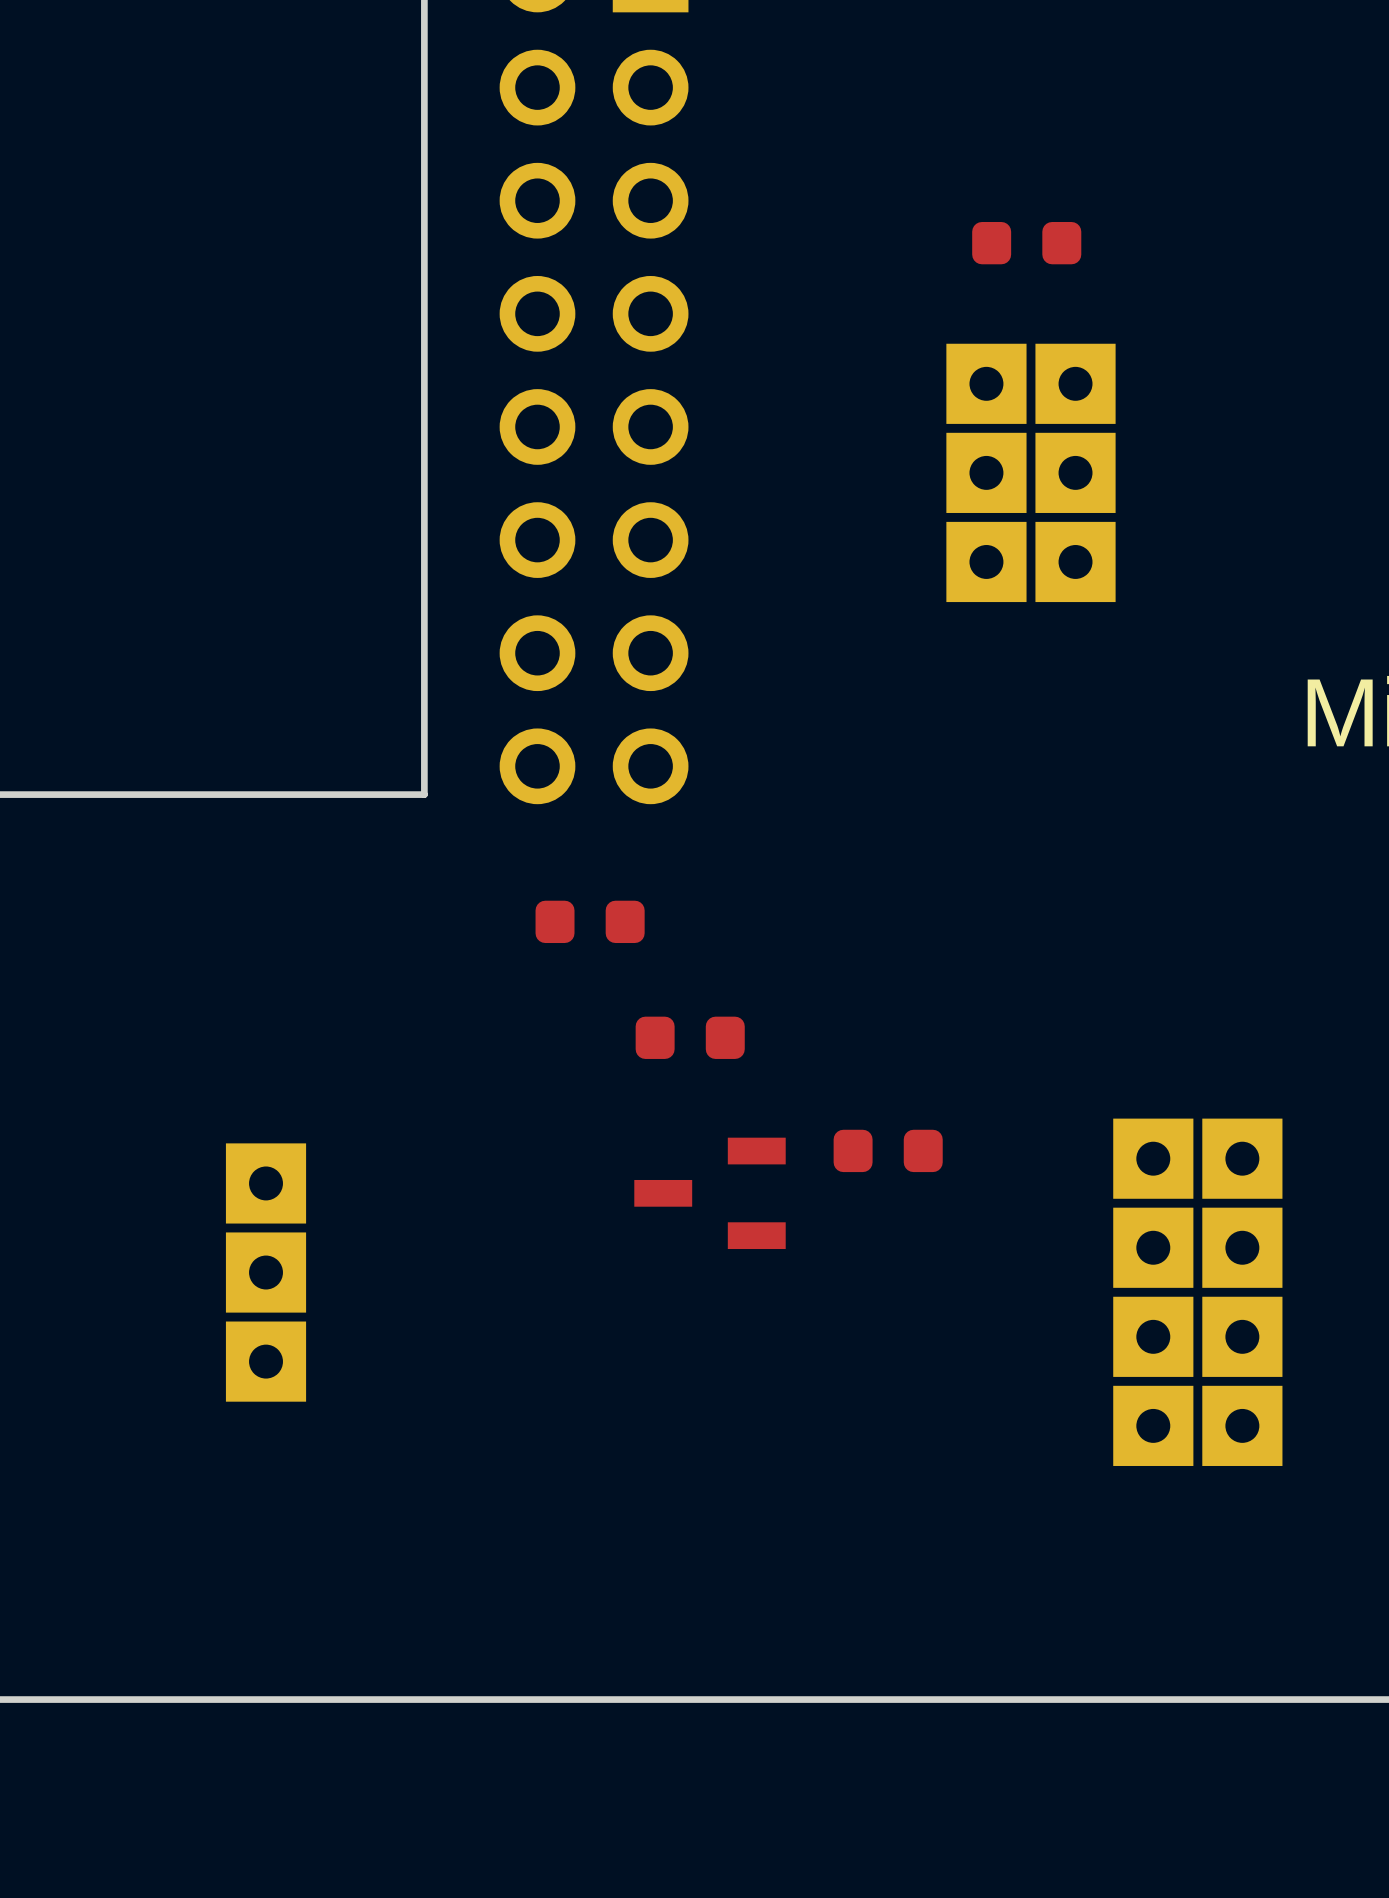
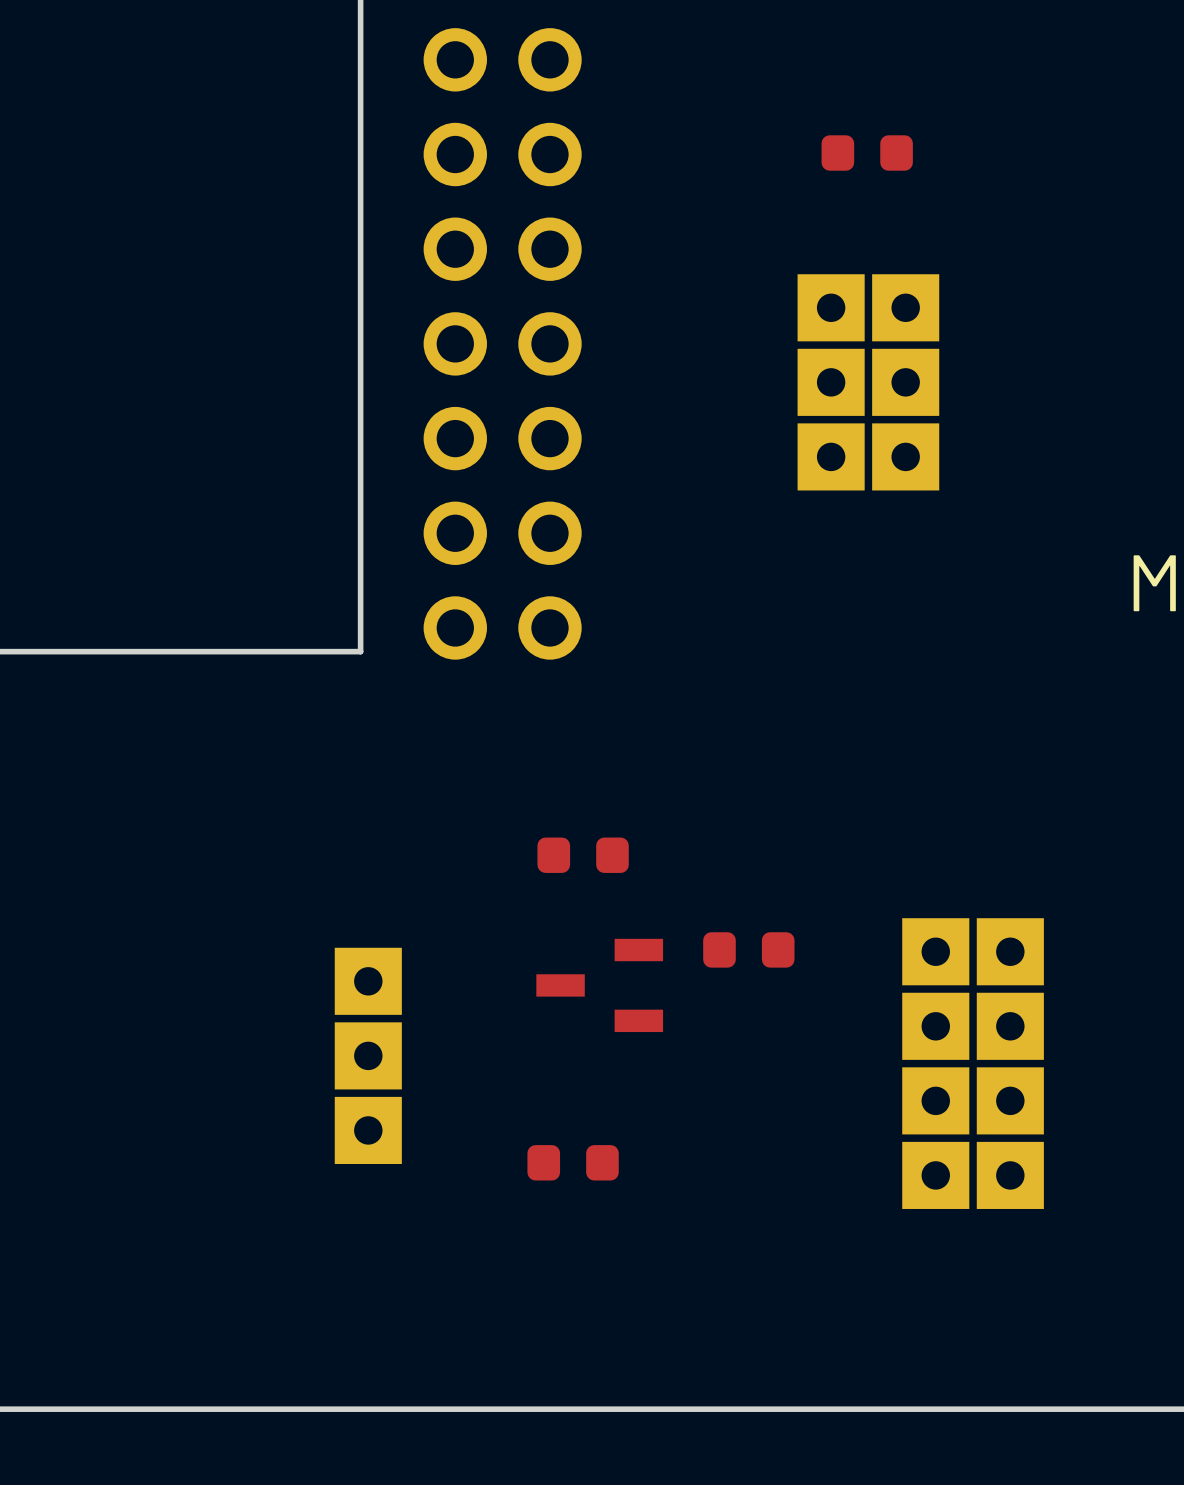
part position: (1026, 243) -> (867, 153)
part position: (590, 921) -> (573, 1162)
part position: (266, 1272) -> (368, 1055)
part position: (1197, 1292) -> (973, 1063)

